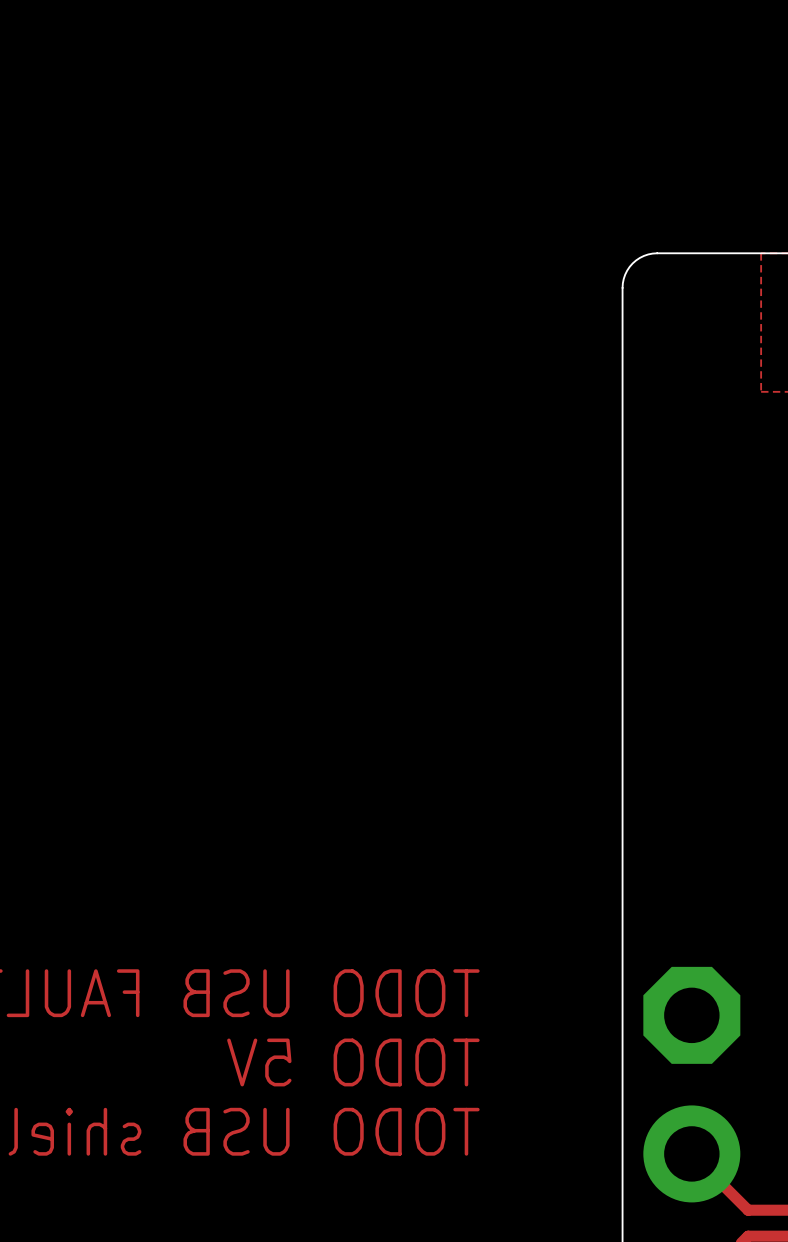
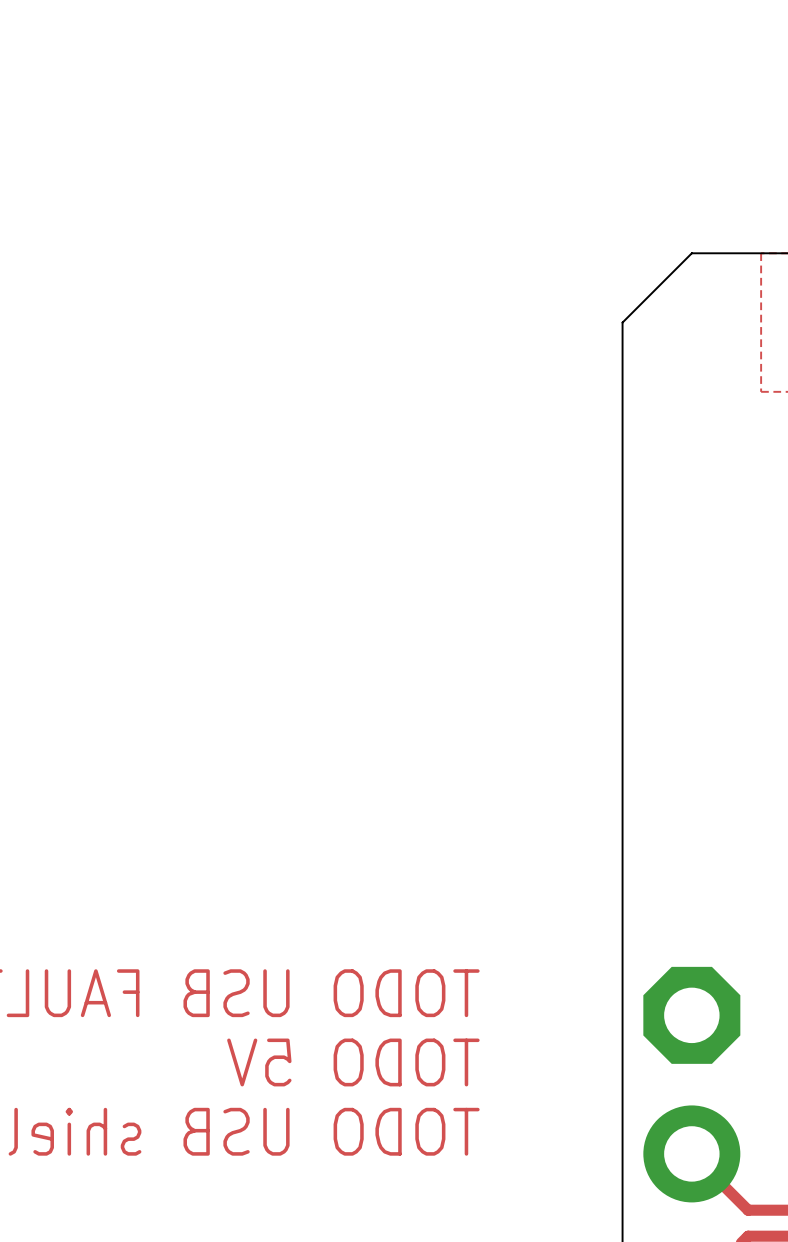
board edge: (691, 253) (652, 253) (643, 255) (632, 263) (625, 274) (622, 283) (622, 322) -> (691, 253) (622, 322)

